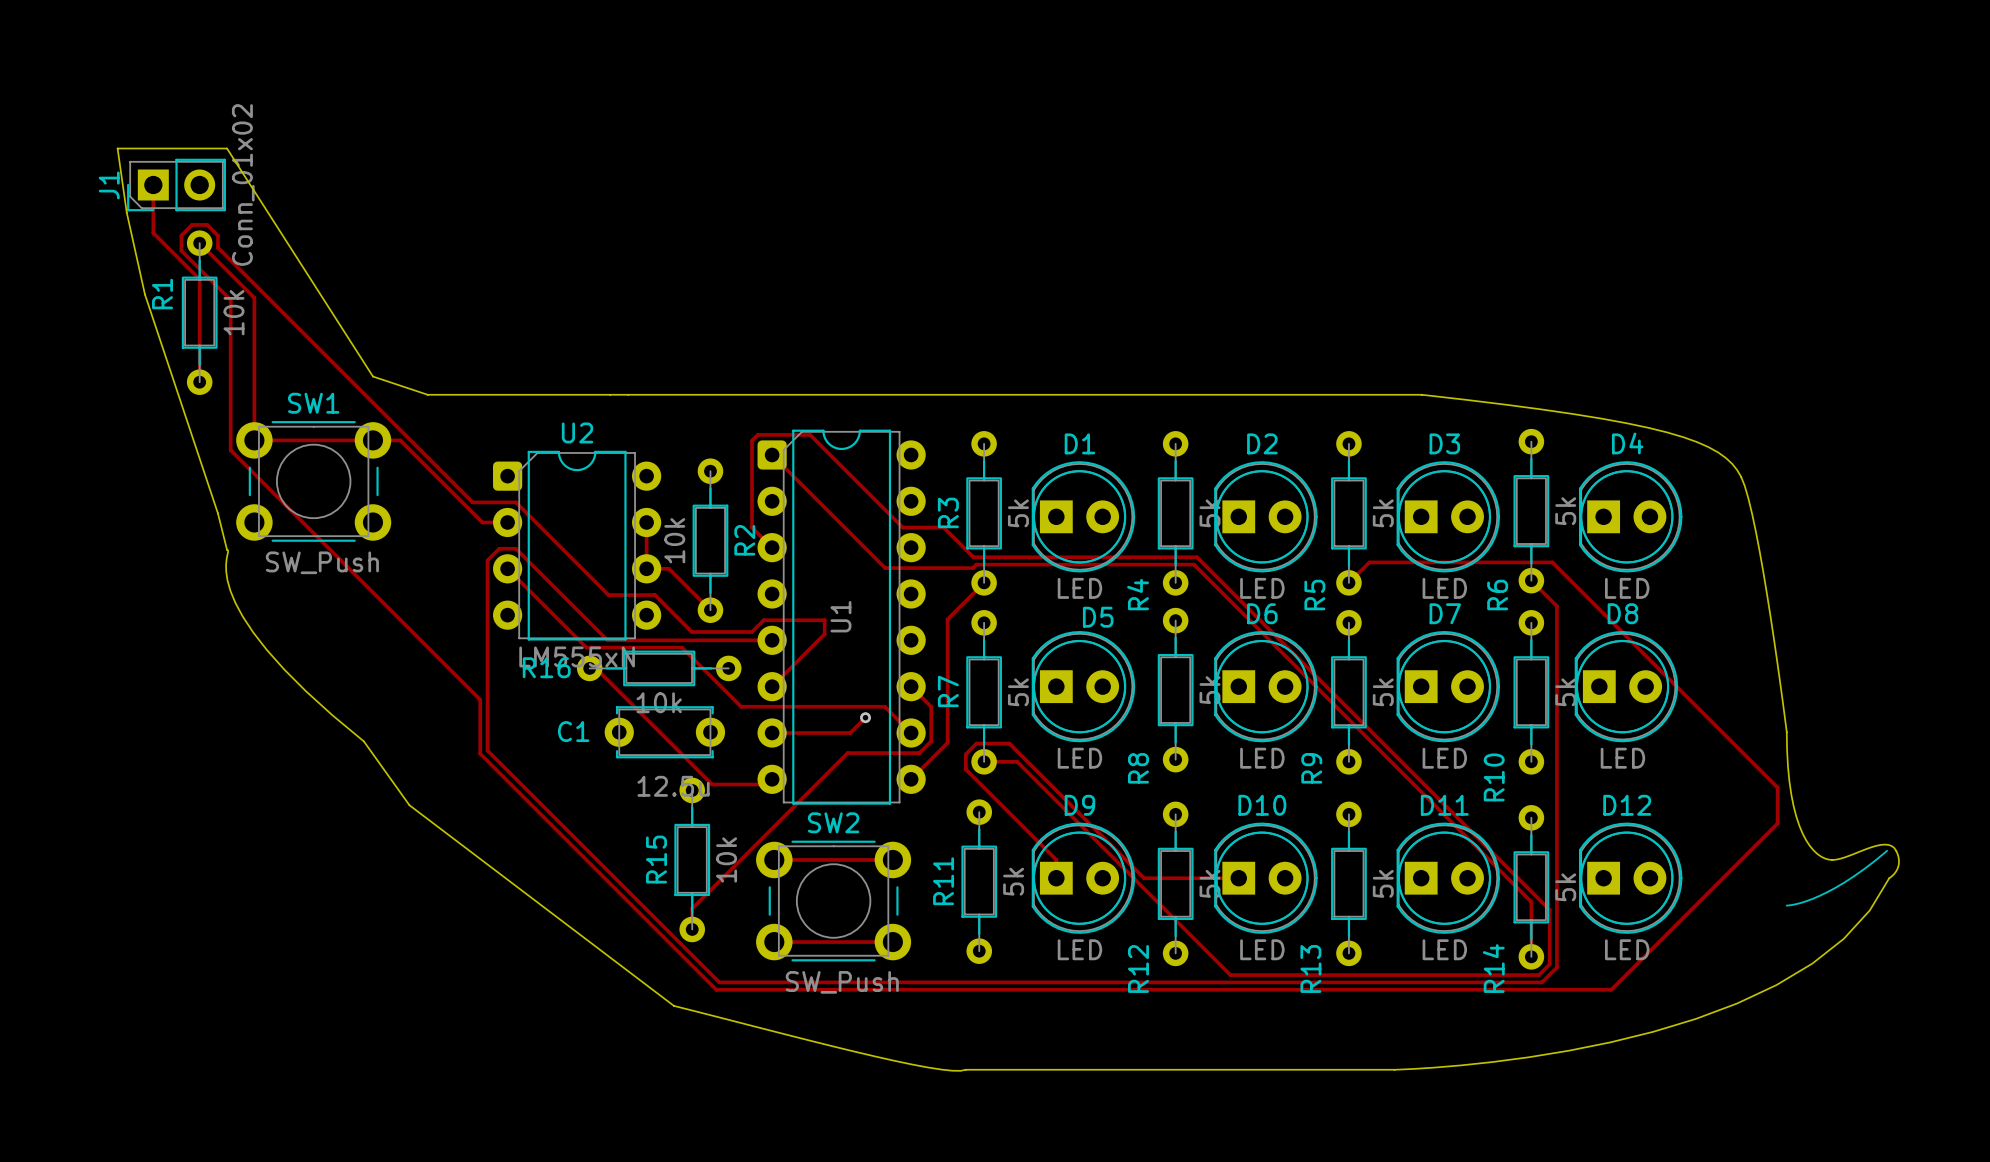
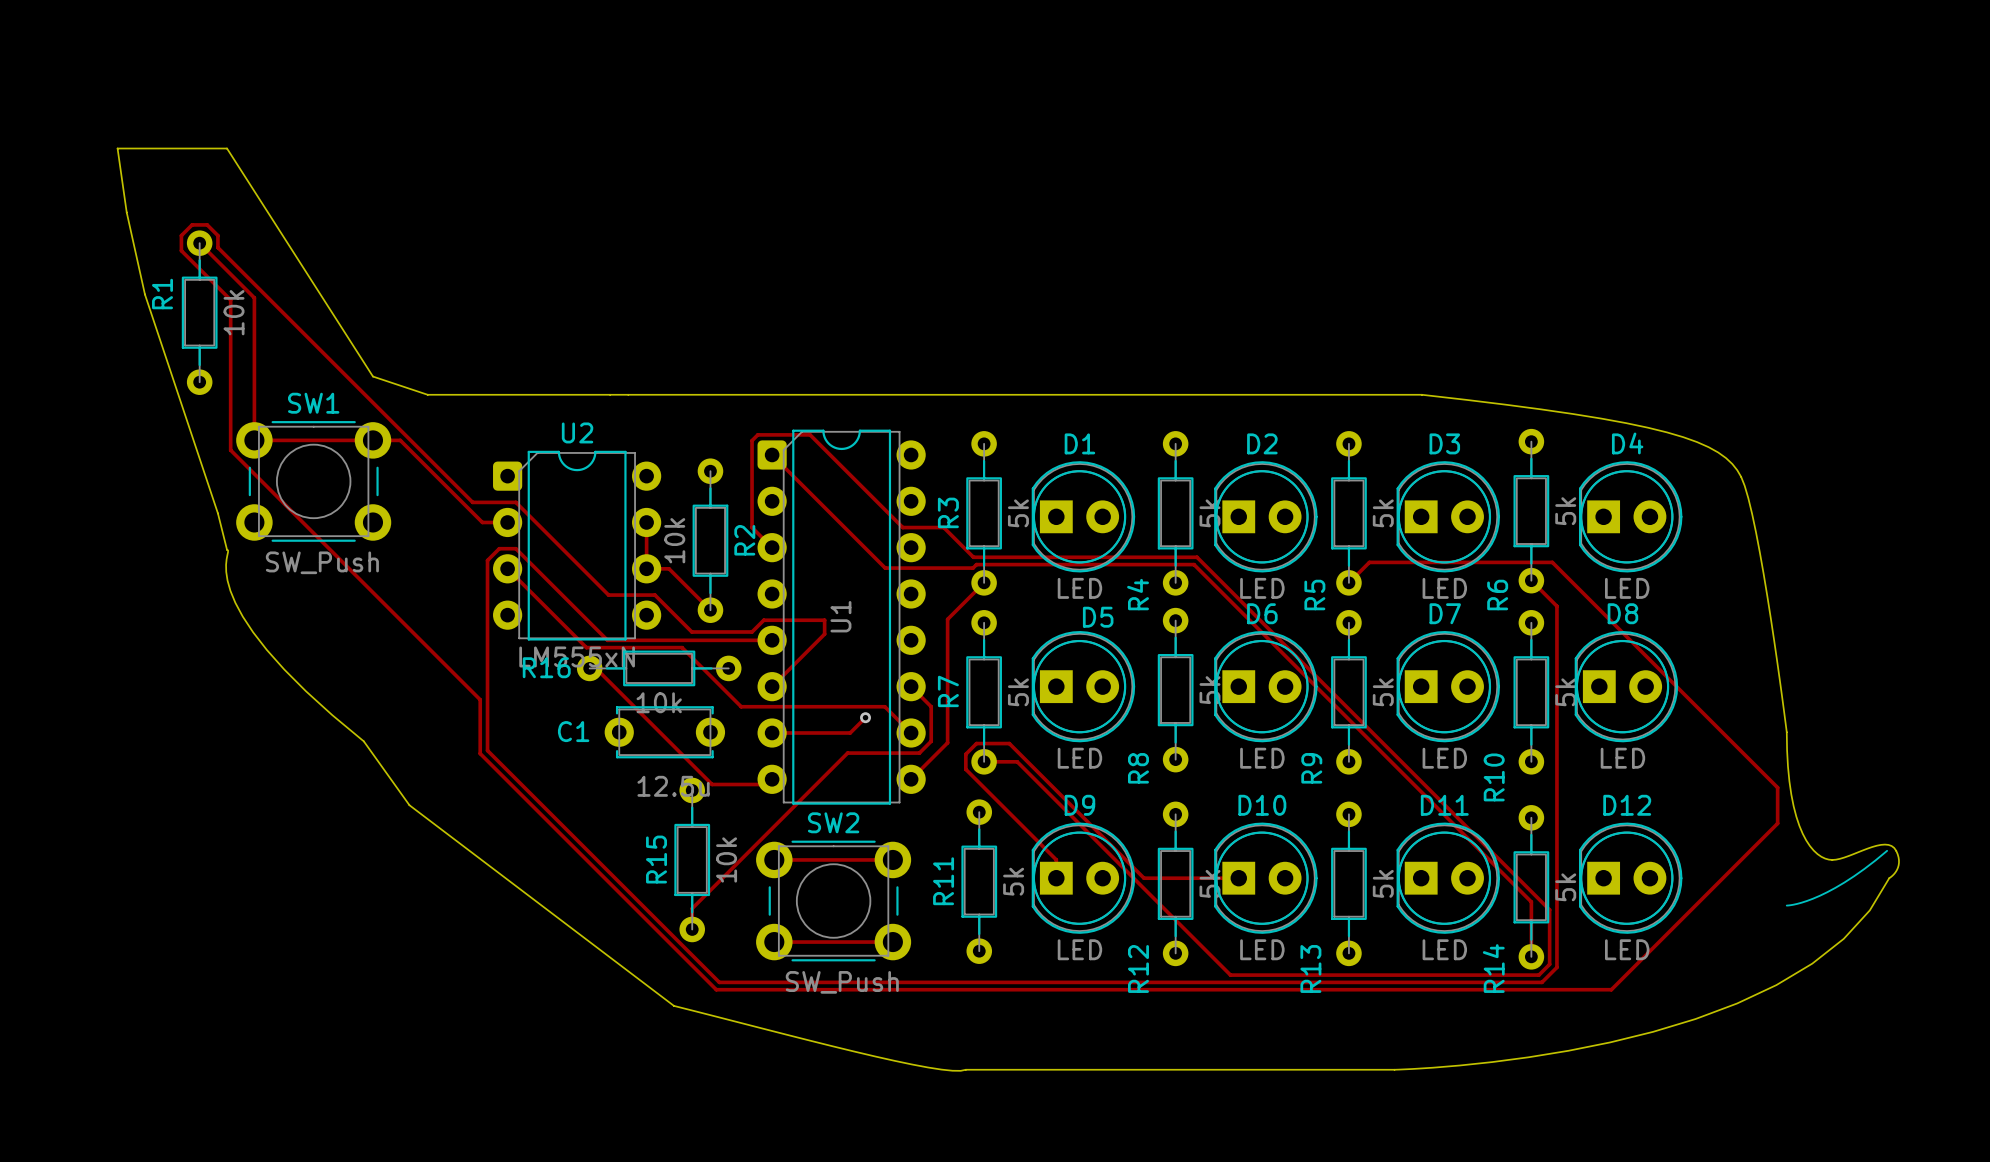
track: (153, 184) (153, 233) (199, 279) (199, 382) -> none
J1: Conn_01x02 (176, 184) -> none

